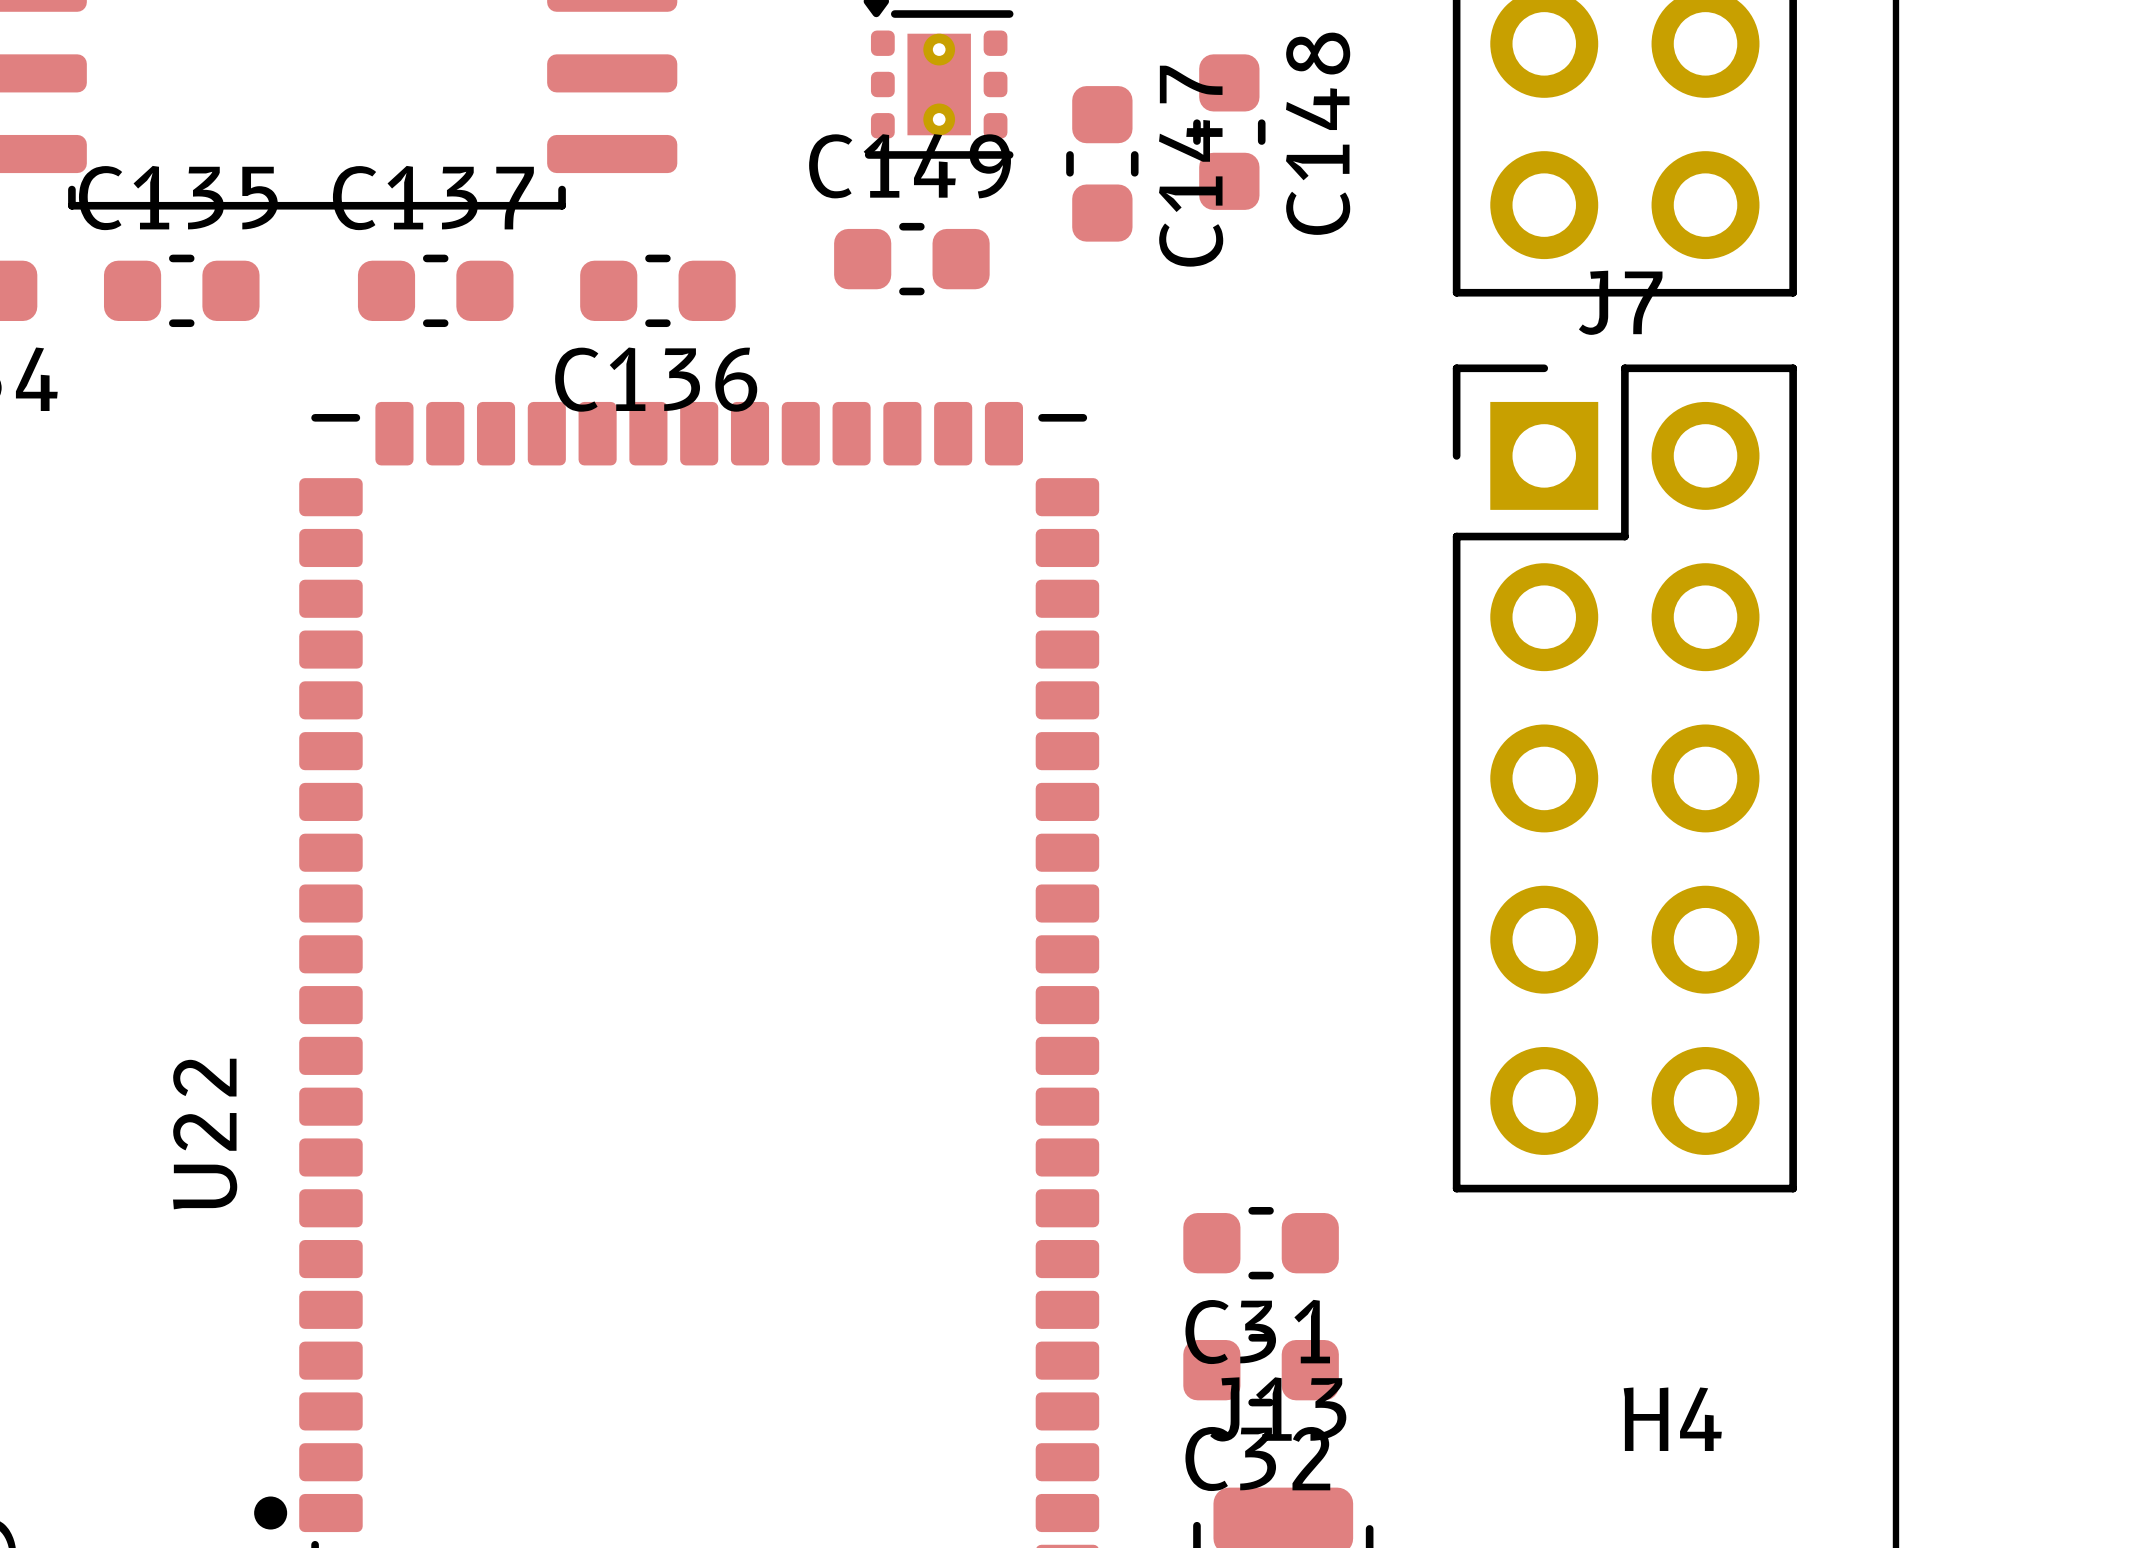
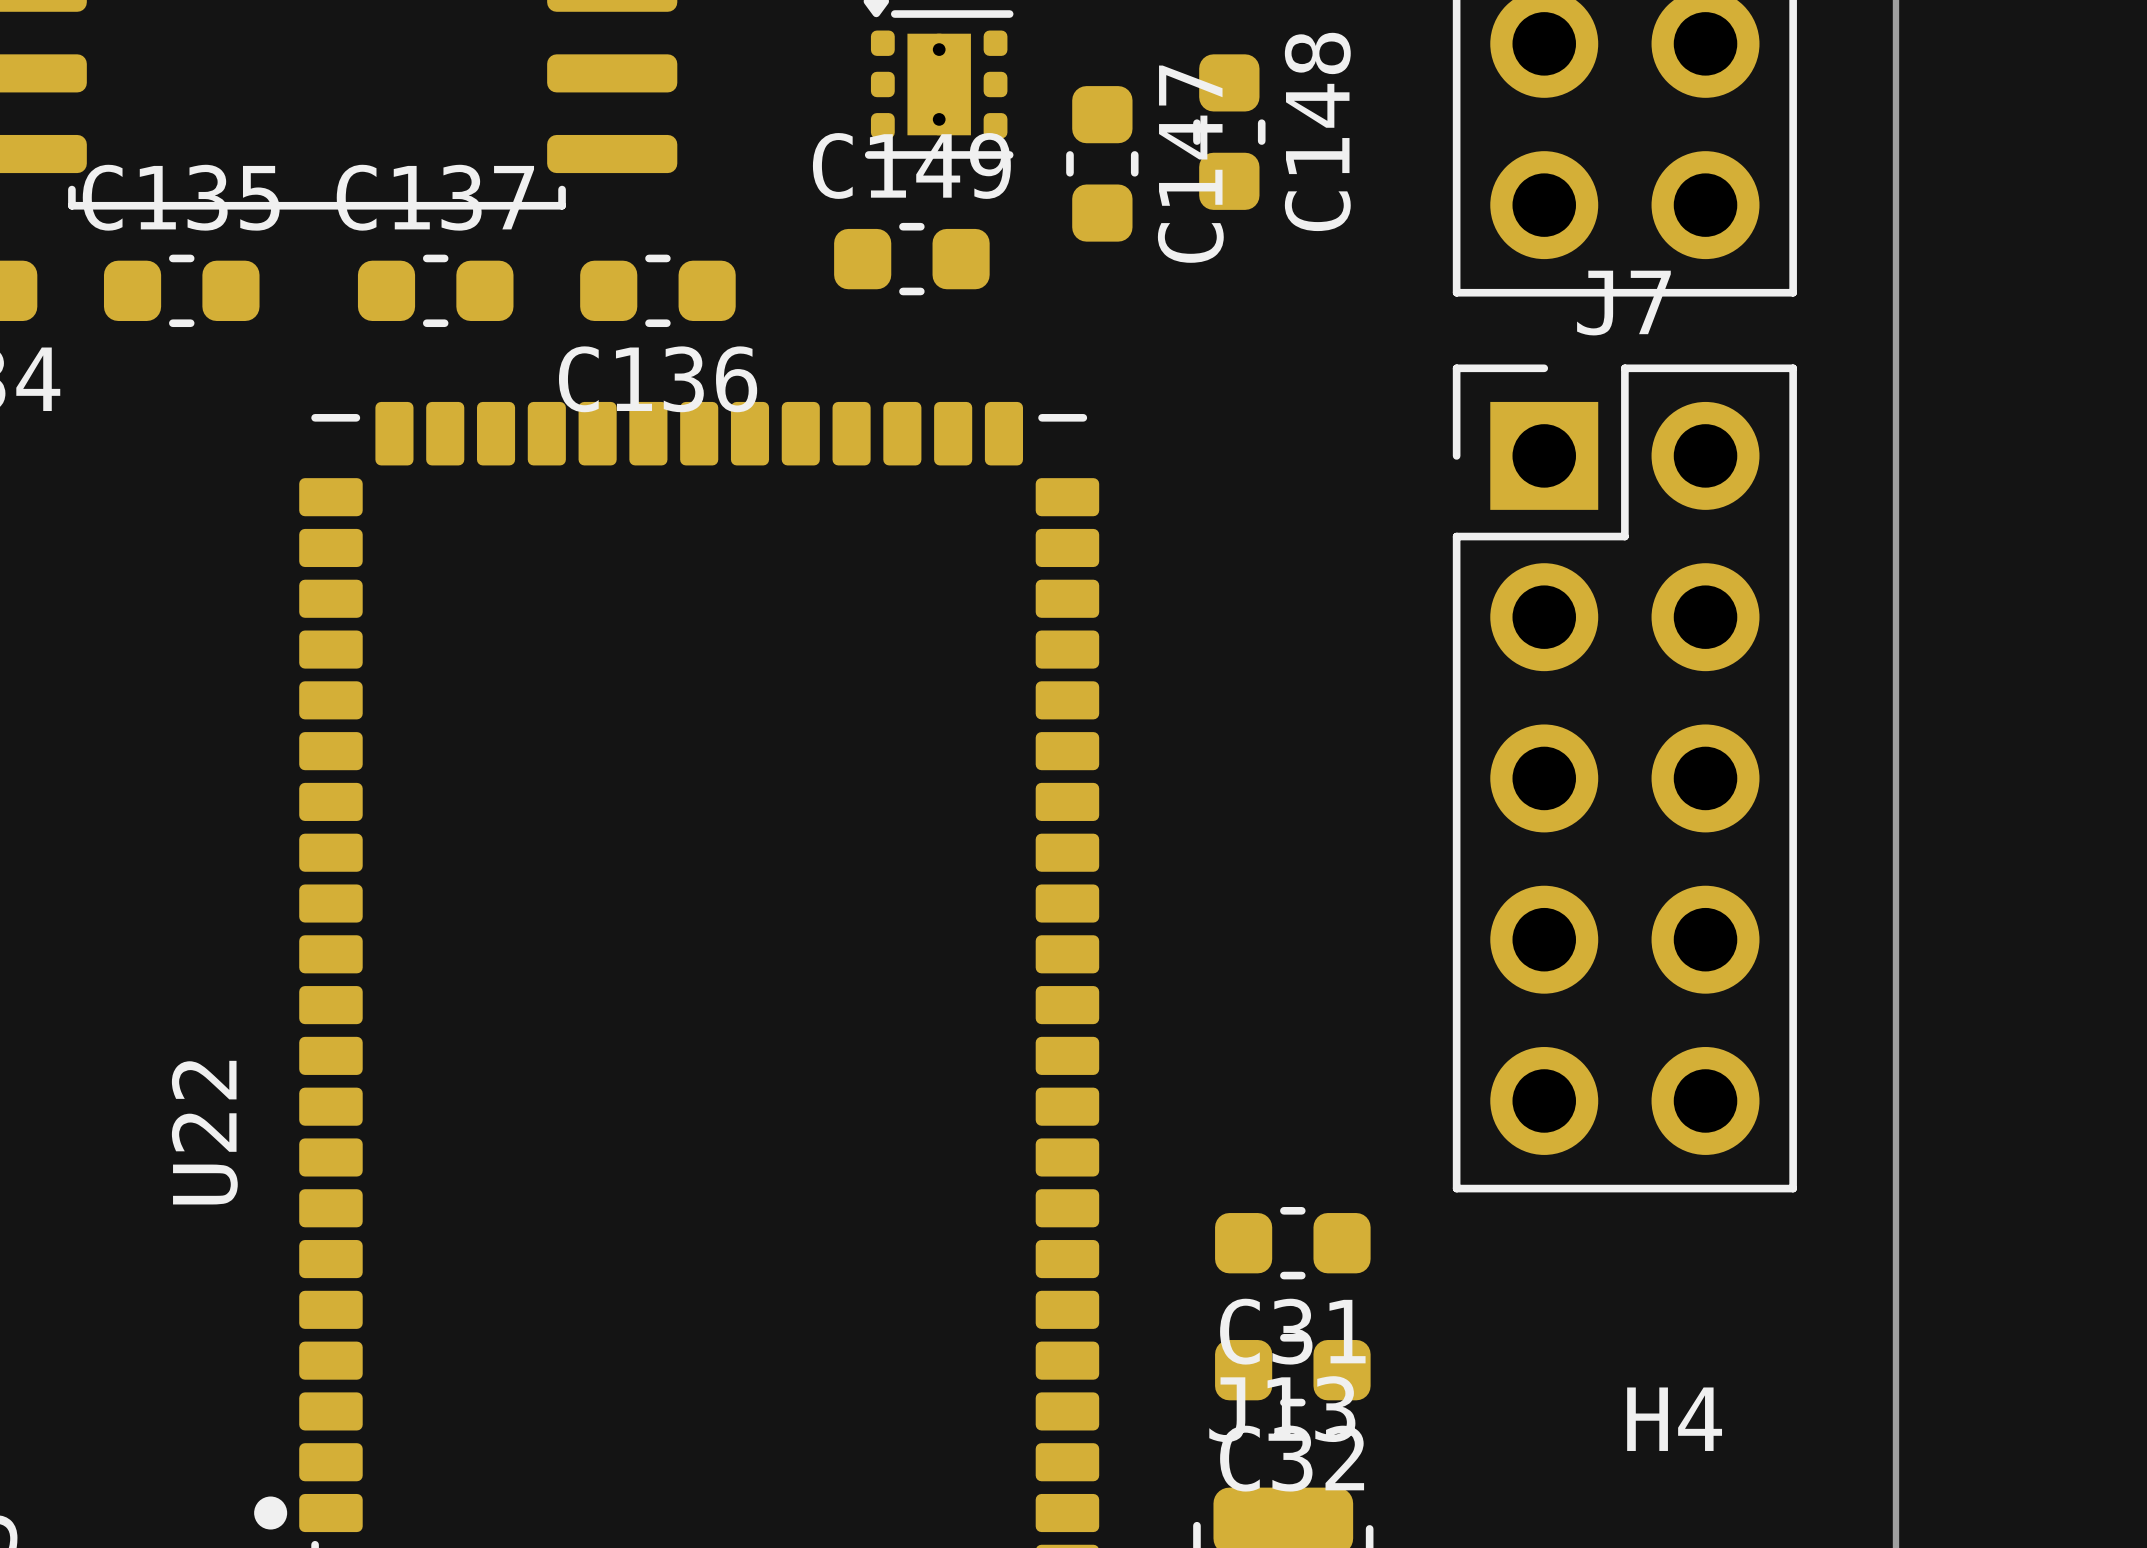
C31 position: (1261, 1243) -> (1292, 1243)
C32 position: (1261, 1370) -> (1292, 1370)

